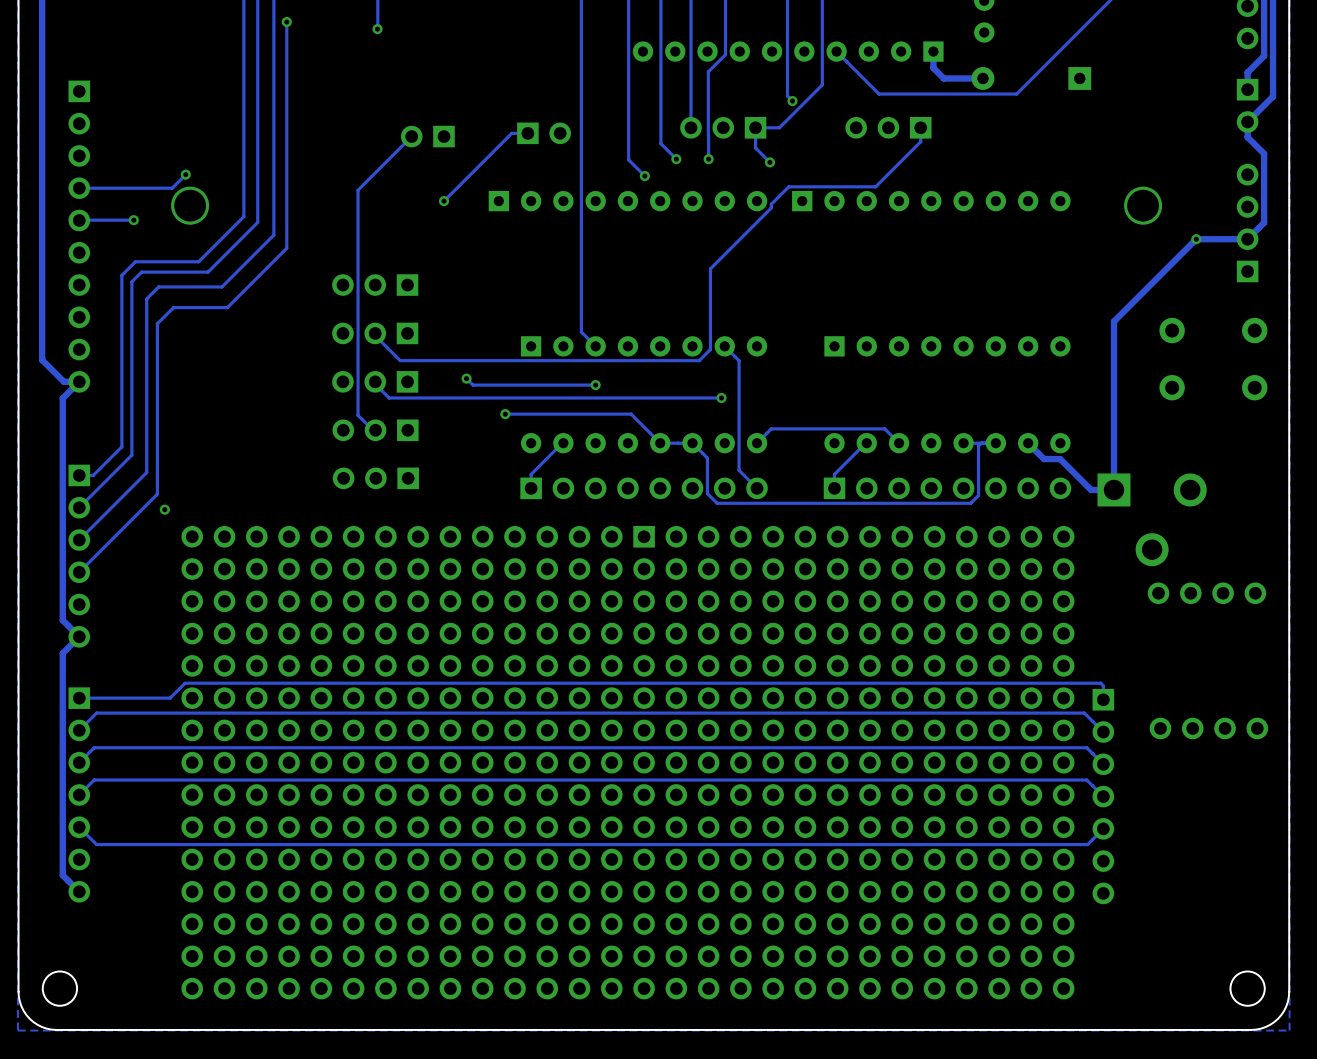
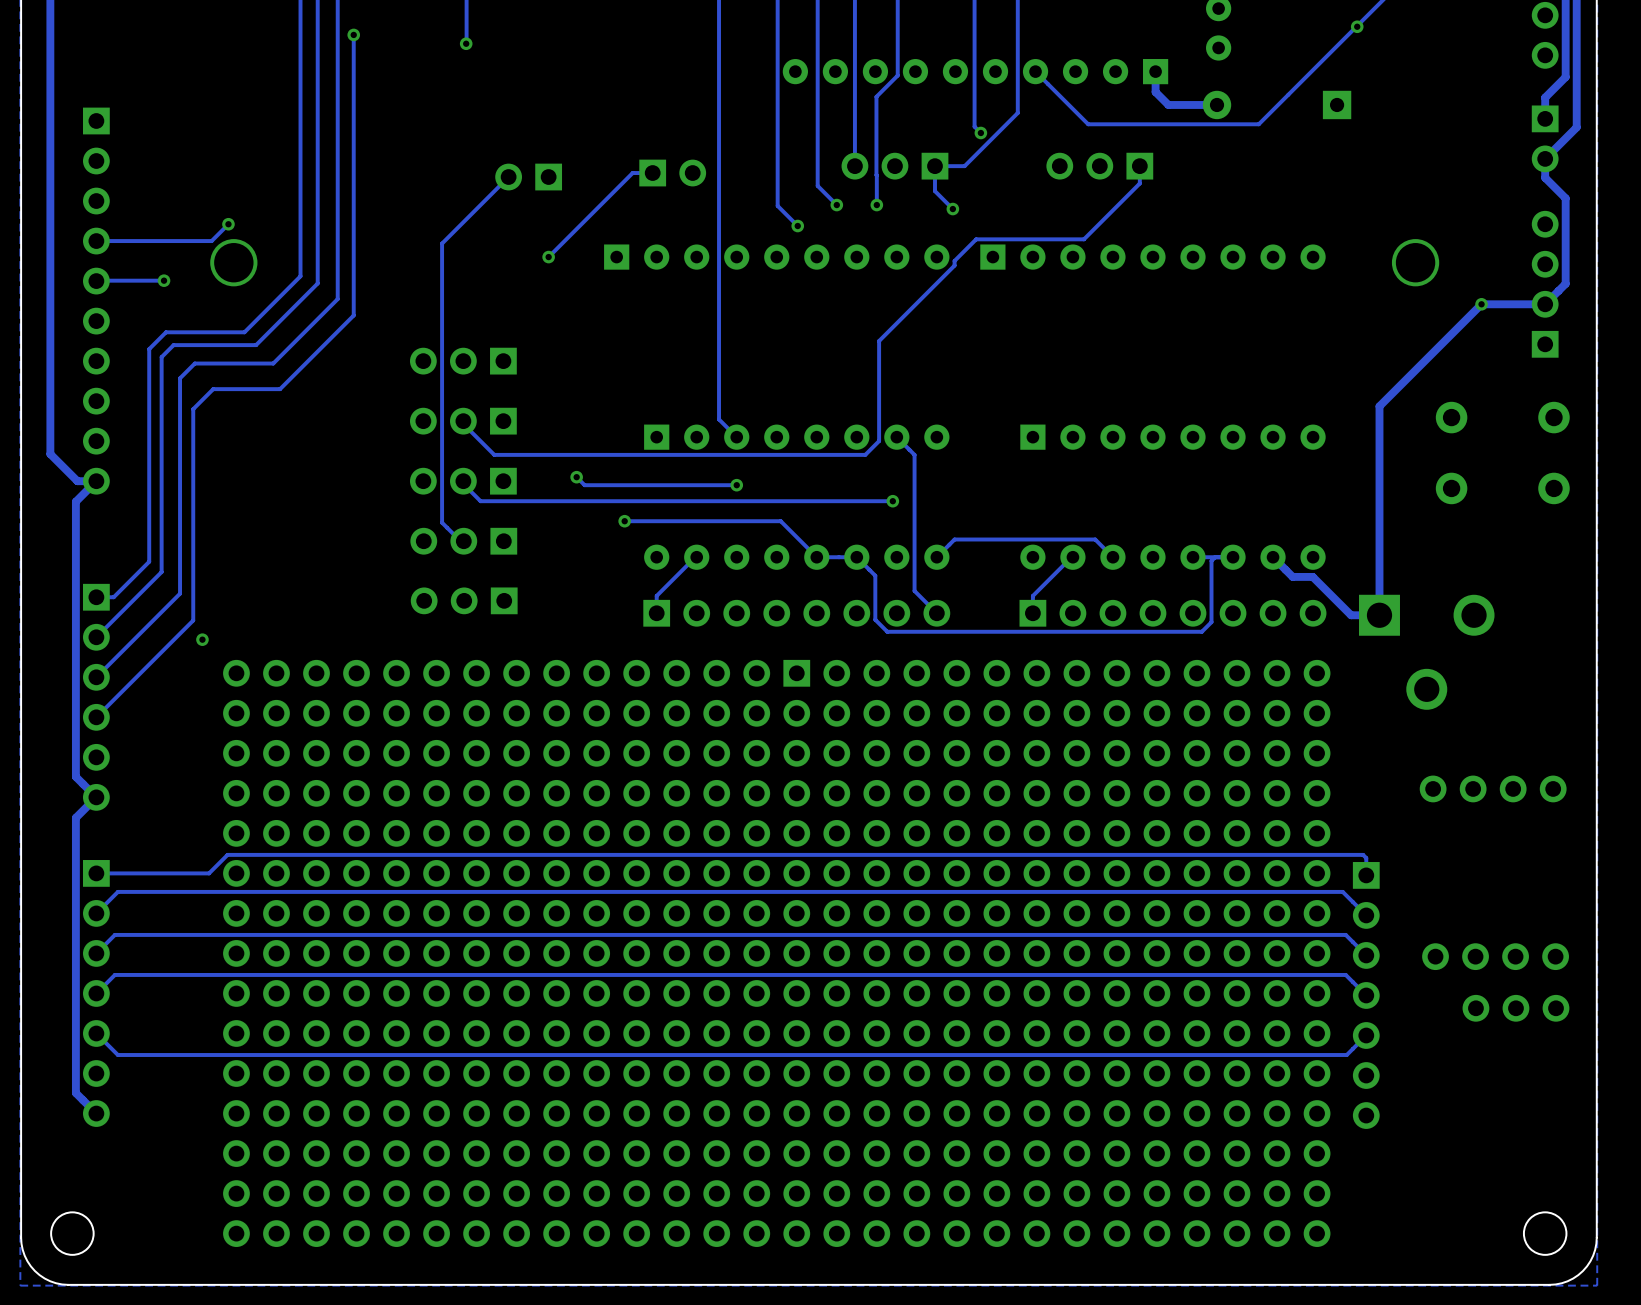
via: none -> (1357, 26)
part position: (1206, 593) -> (1493, 788)
part position: (1208, 728) -> (1495, 956)
part: none -> (1515, 1008)

